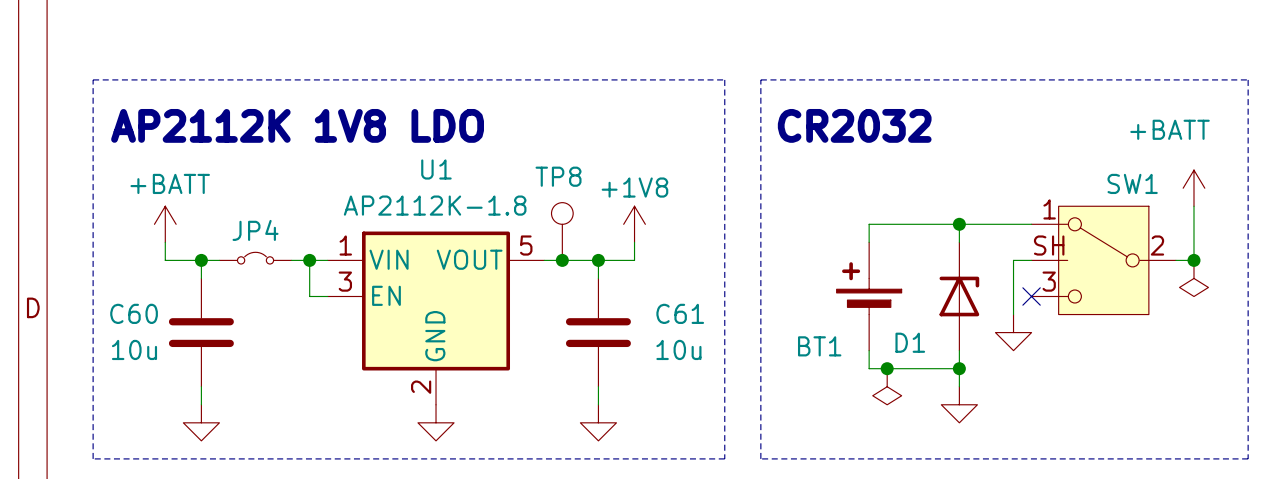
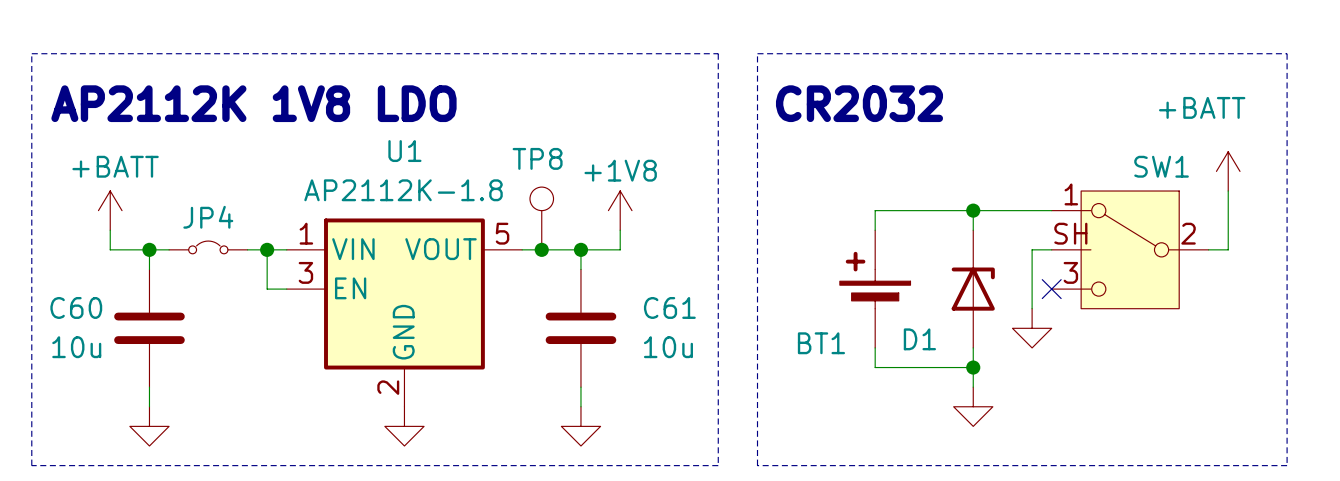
junction: (1193, 260) -> none
power symbol: (1193, 278) -> none
junction: (887, 368) -> none
power symbol: (887, 386) -> none

